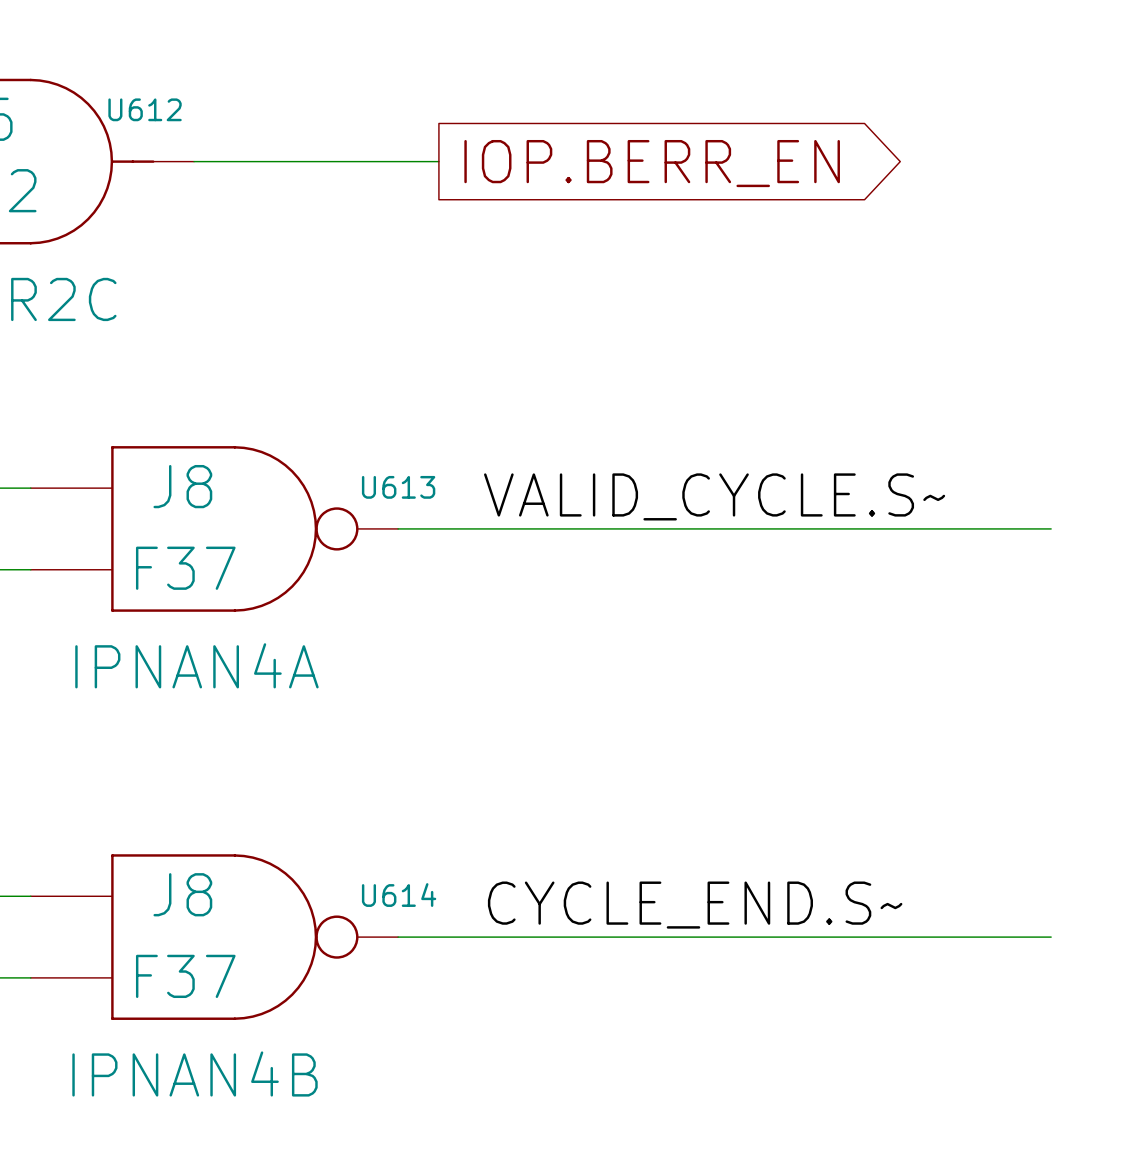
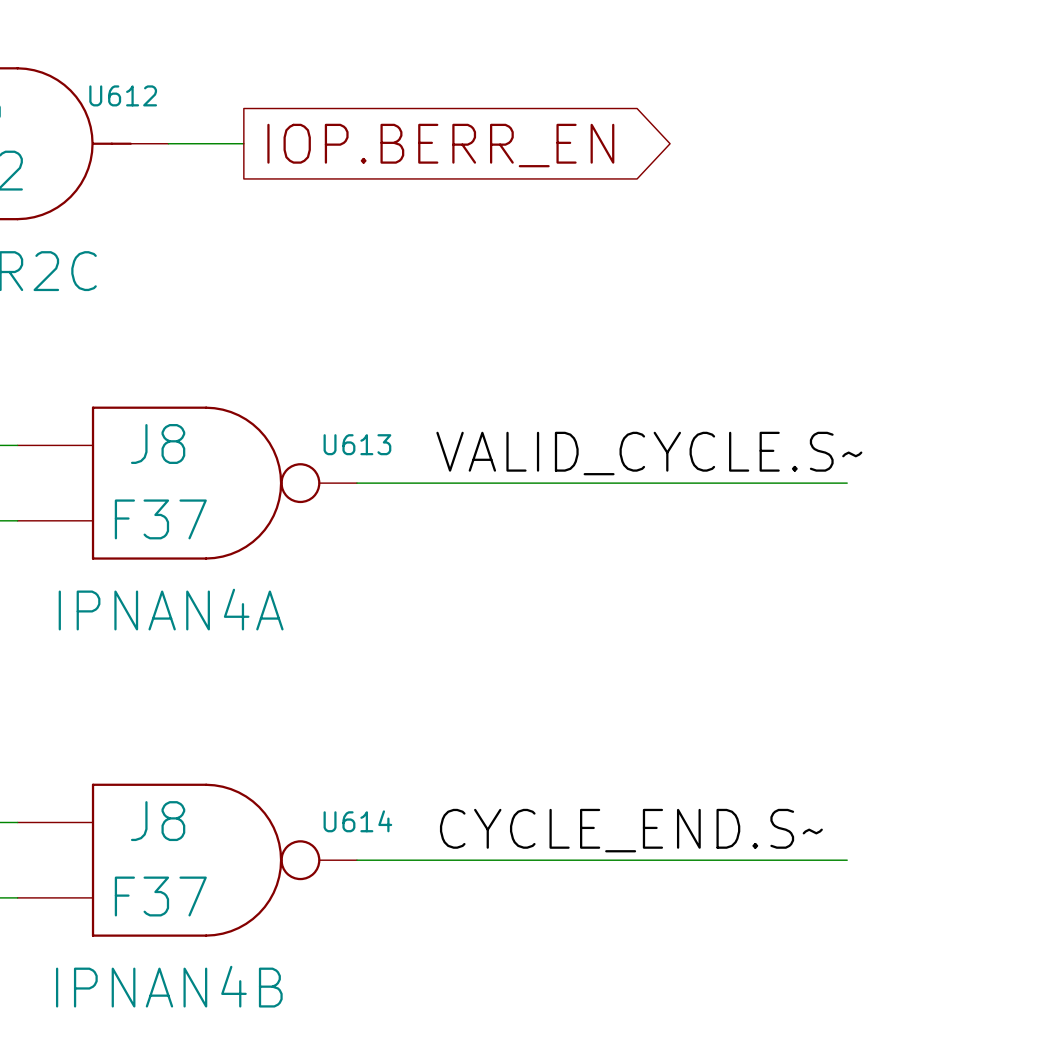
wire: (275, 161) (438, 161) -> none
global label position: IOP.BERR_EN (652, 163) -> IOP.BERR_EN (440, 145)
wire: (928, 528) (1051, 528) -> none
wire: (928, 937) (1051, 937) -> none

